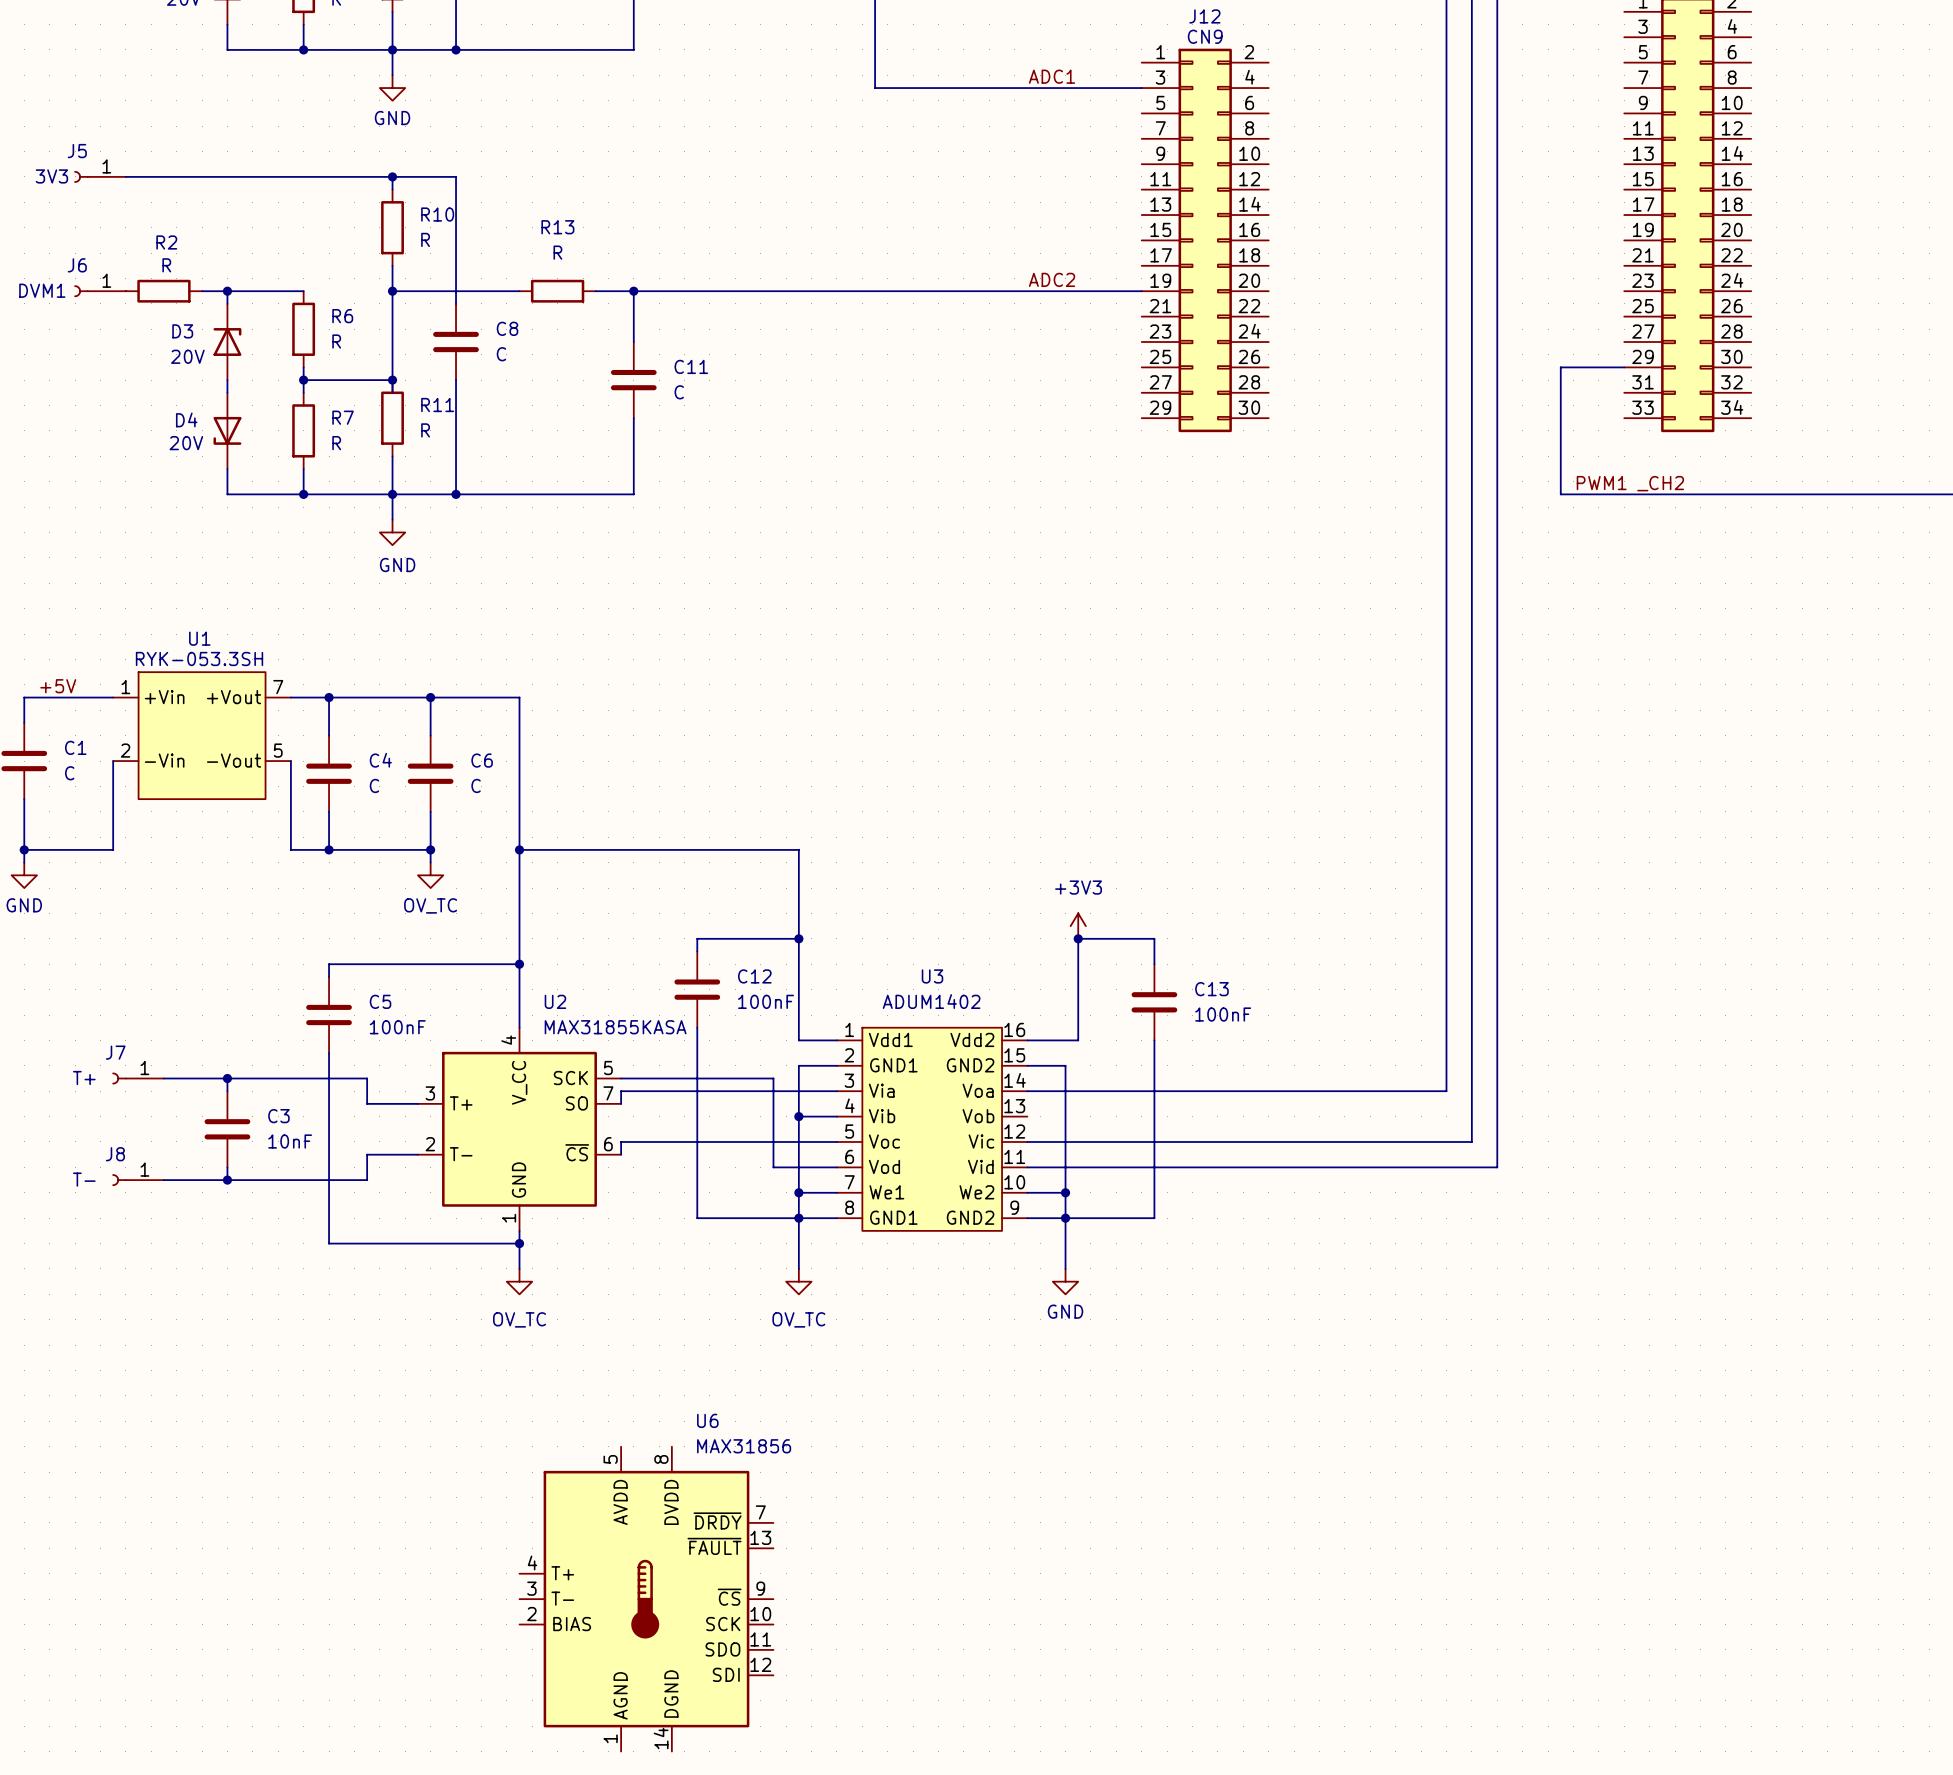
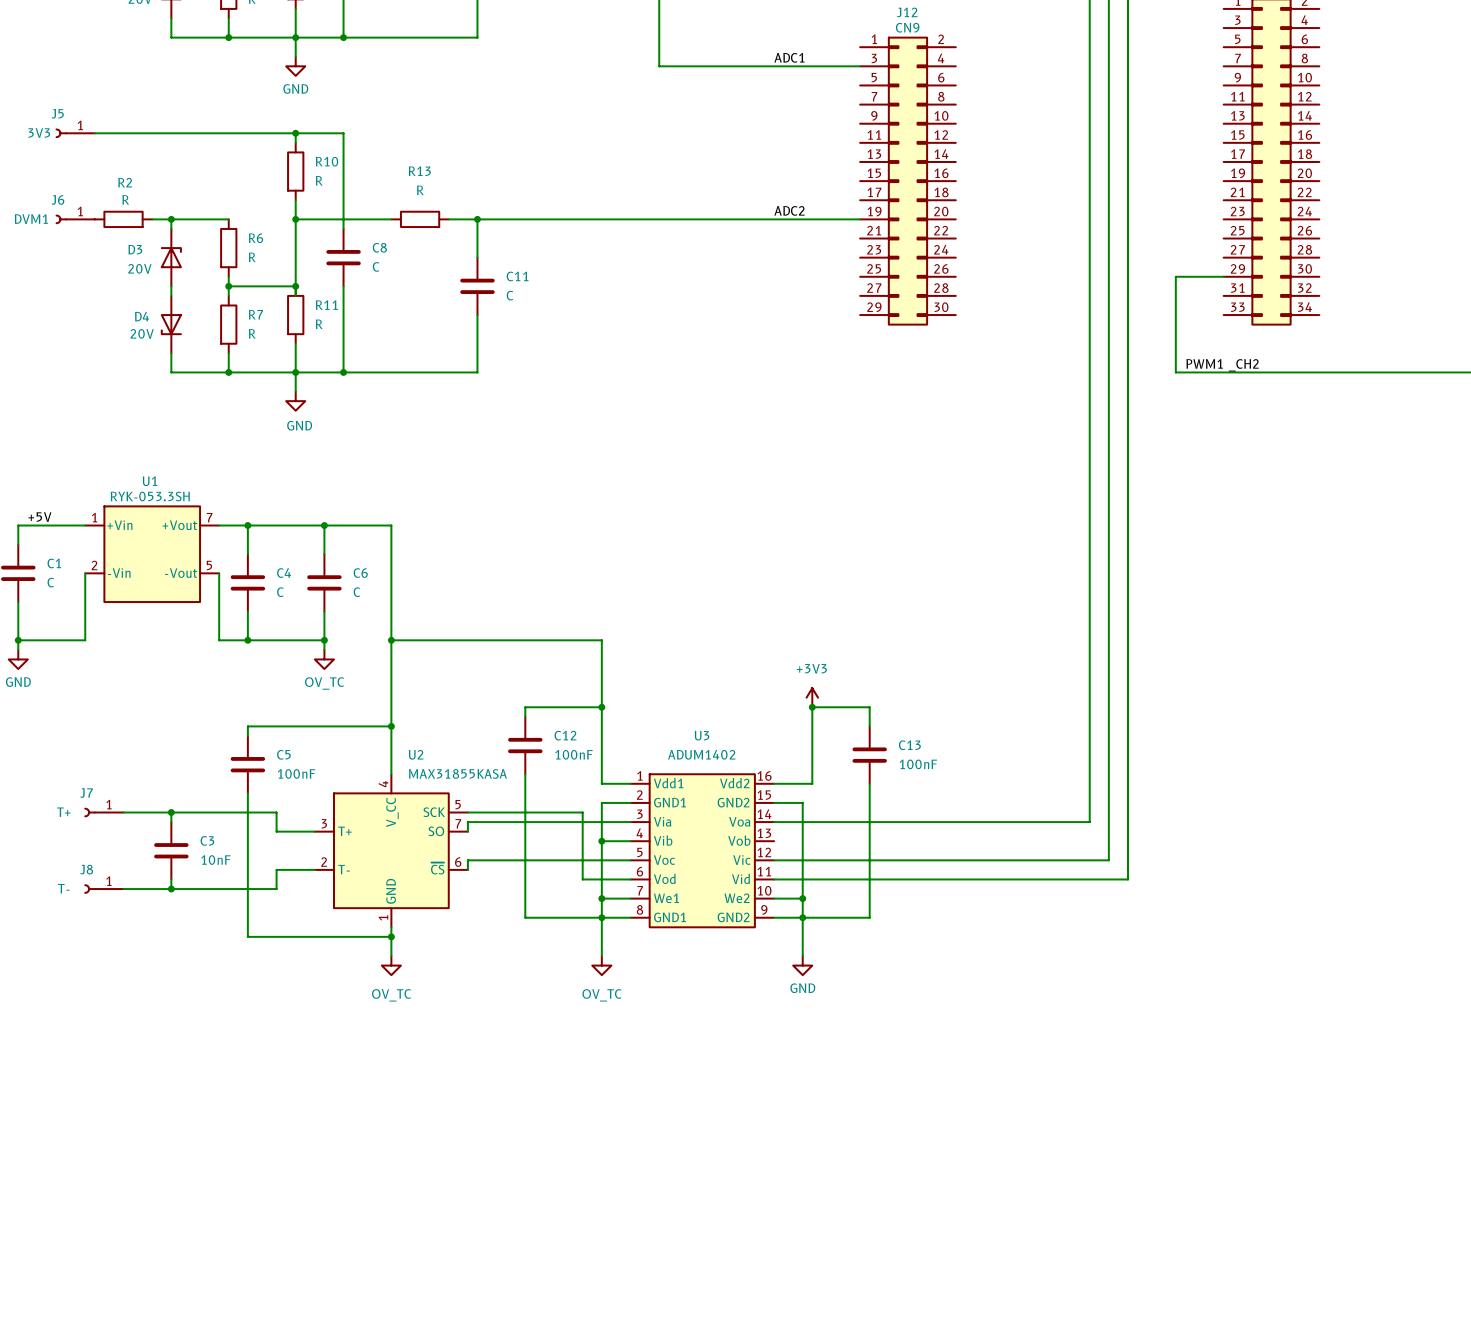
U6: MAX31856 (646, 1599) -> none

